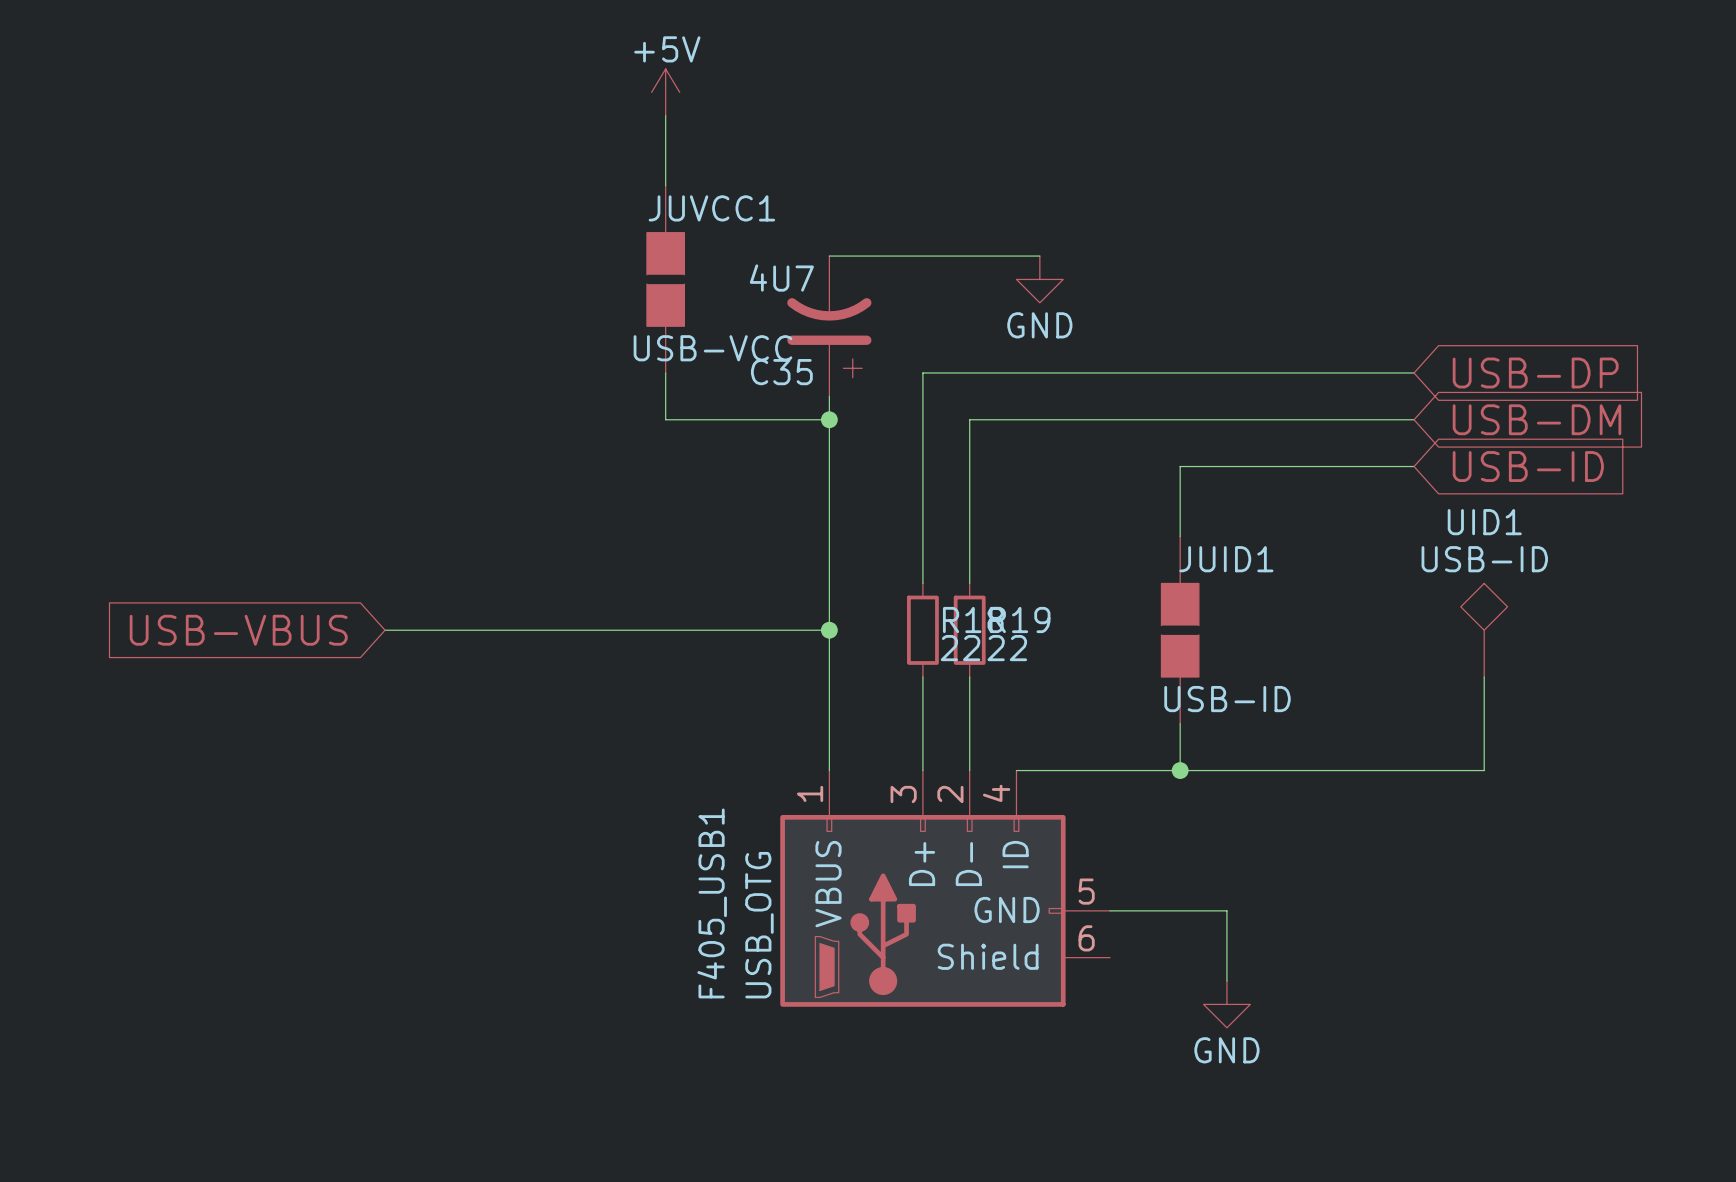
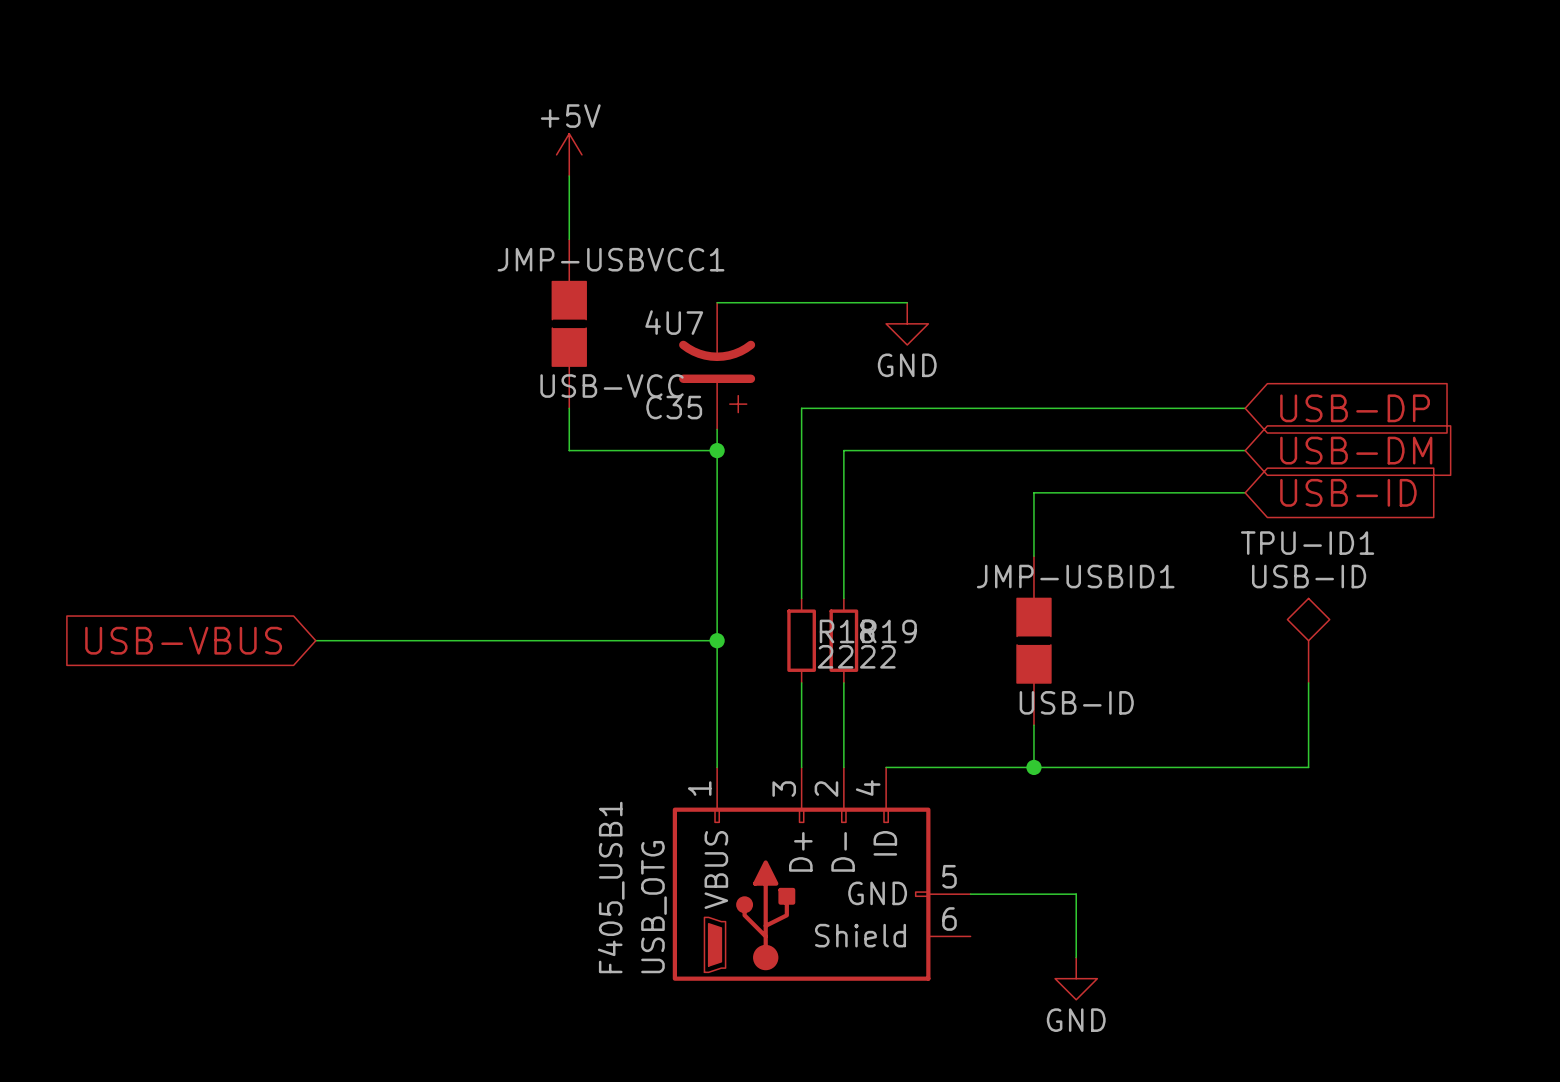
JUVCC1 name: JUVCC1 (711, 208) -> JMP-USBVCC1 (611, 259)
UID1 name: UID1 (1484, 522) -> TPU-ID1 (1307, 543)
JUID1 name: JUID1 (1226, 559) -> JMP-USBID1 (1075, 576)

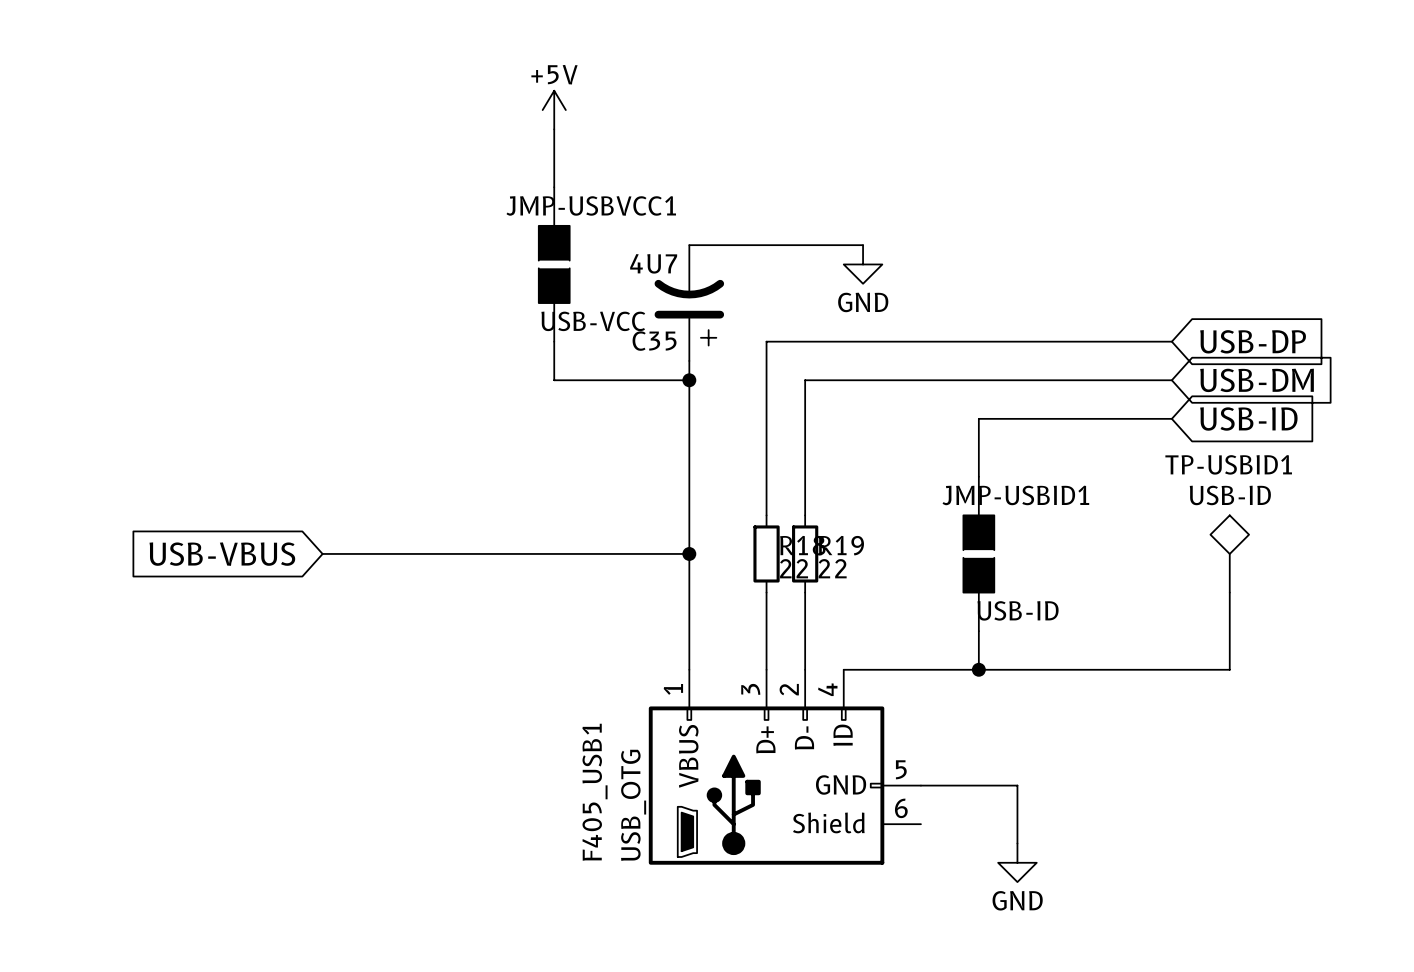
TPU-ID1 name: TPU-ID1 (1307, 543) -> TP-USBID1 (1228, 464)

